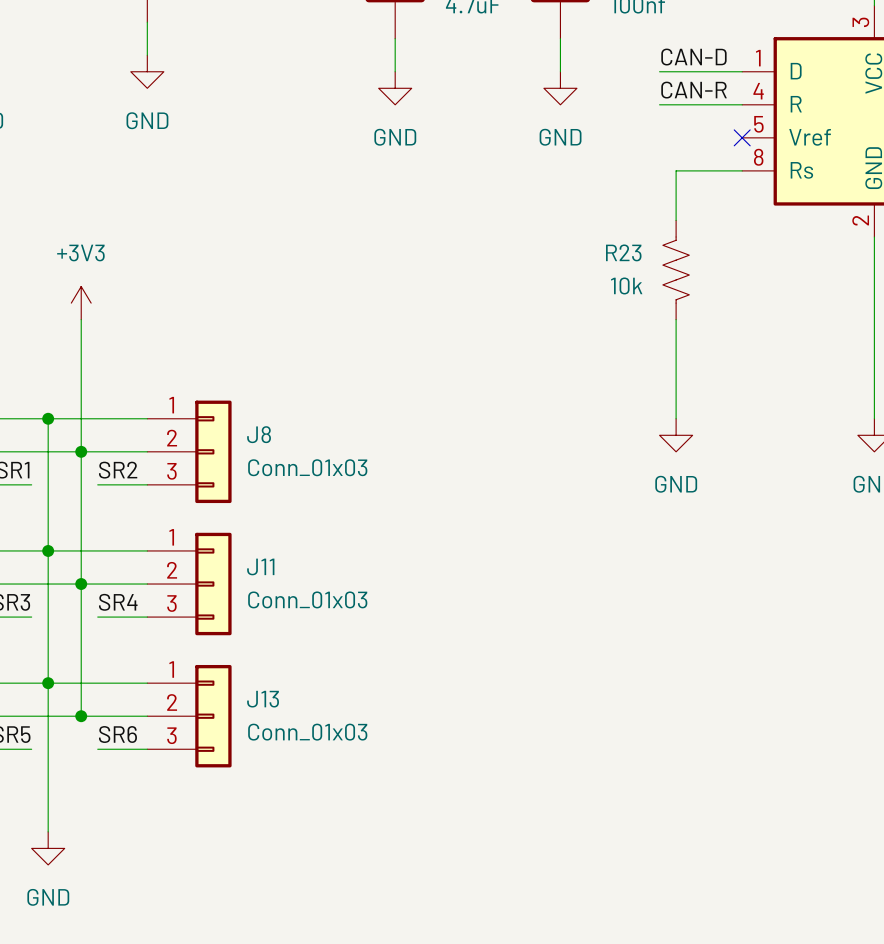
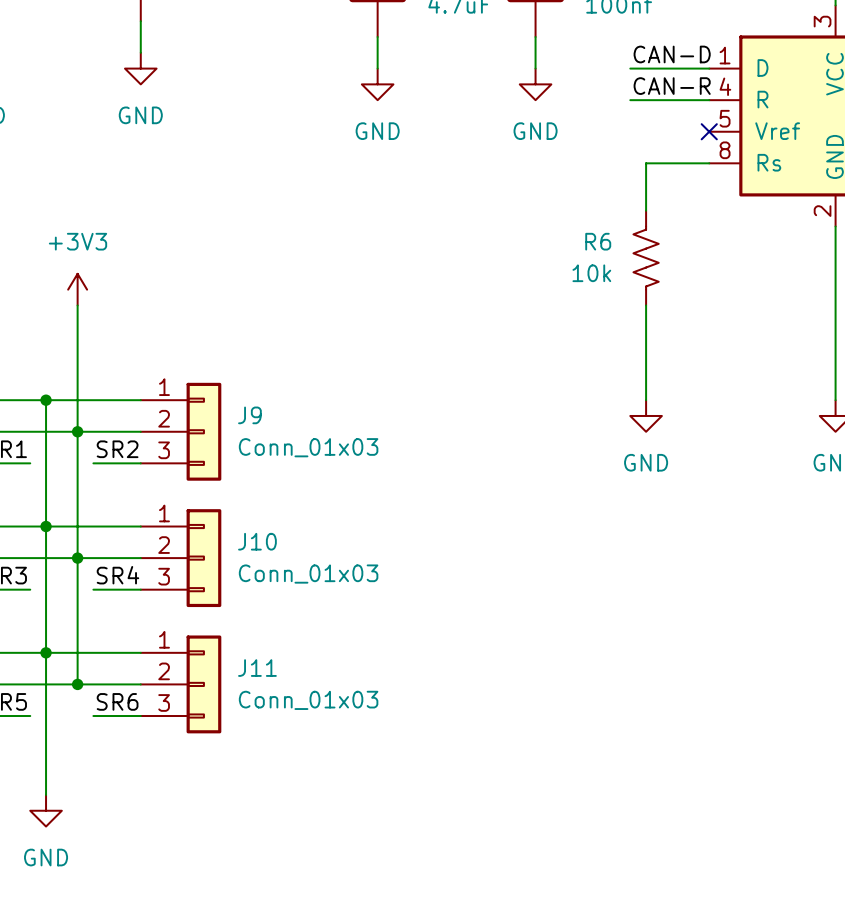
R23 name: R23 (623, 252) -> R6 (598, 241)
J8 name: J8 (259, 434) -> J9 (249, 415)
J11 name: J11 (260, 566) -> J10 (257, 541)
J13 name: J13 (263, 699) -> J11 (257, 668)

